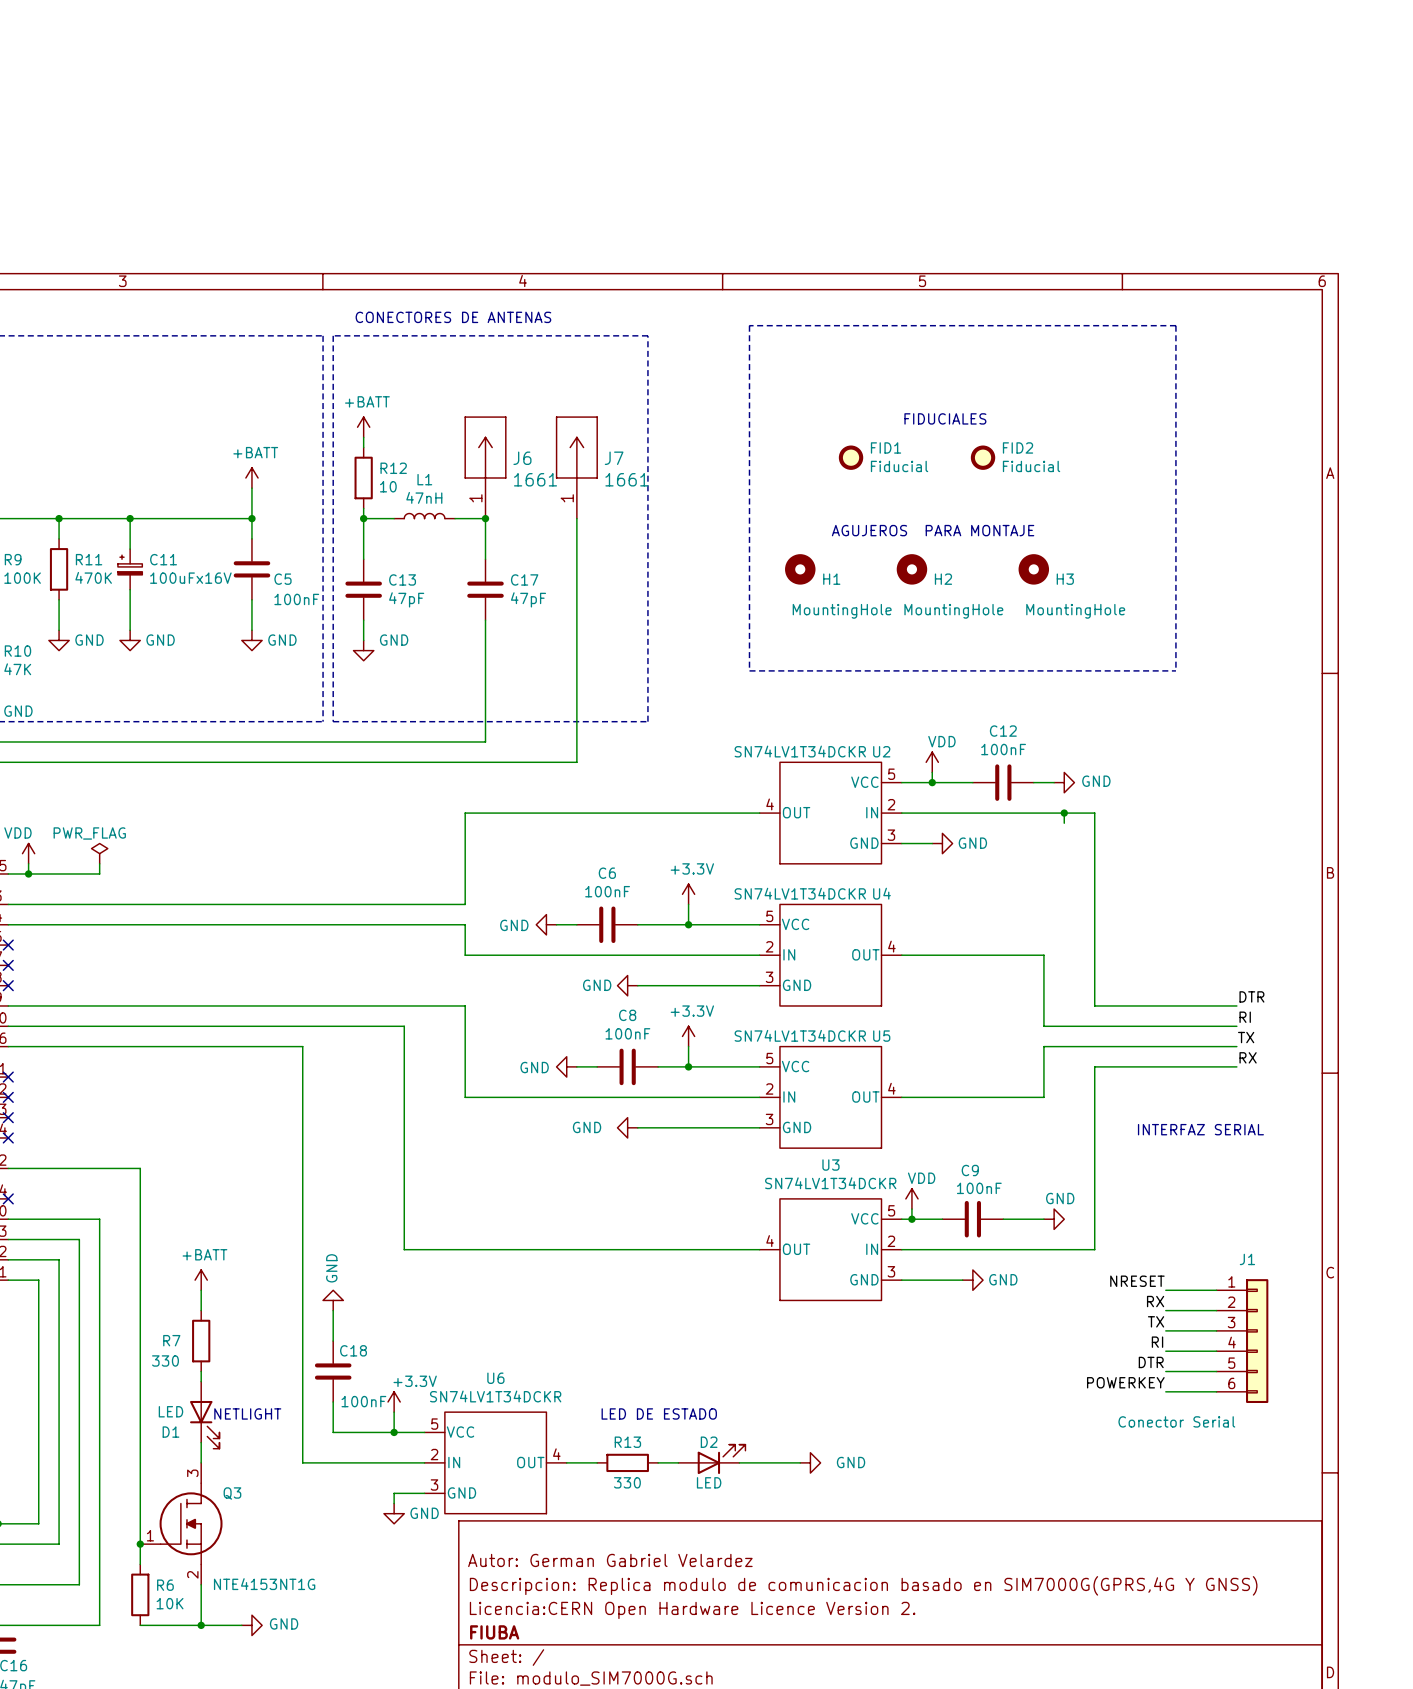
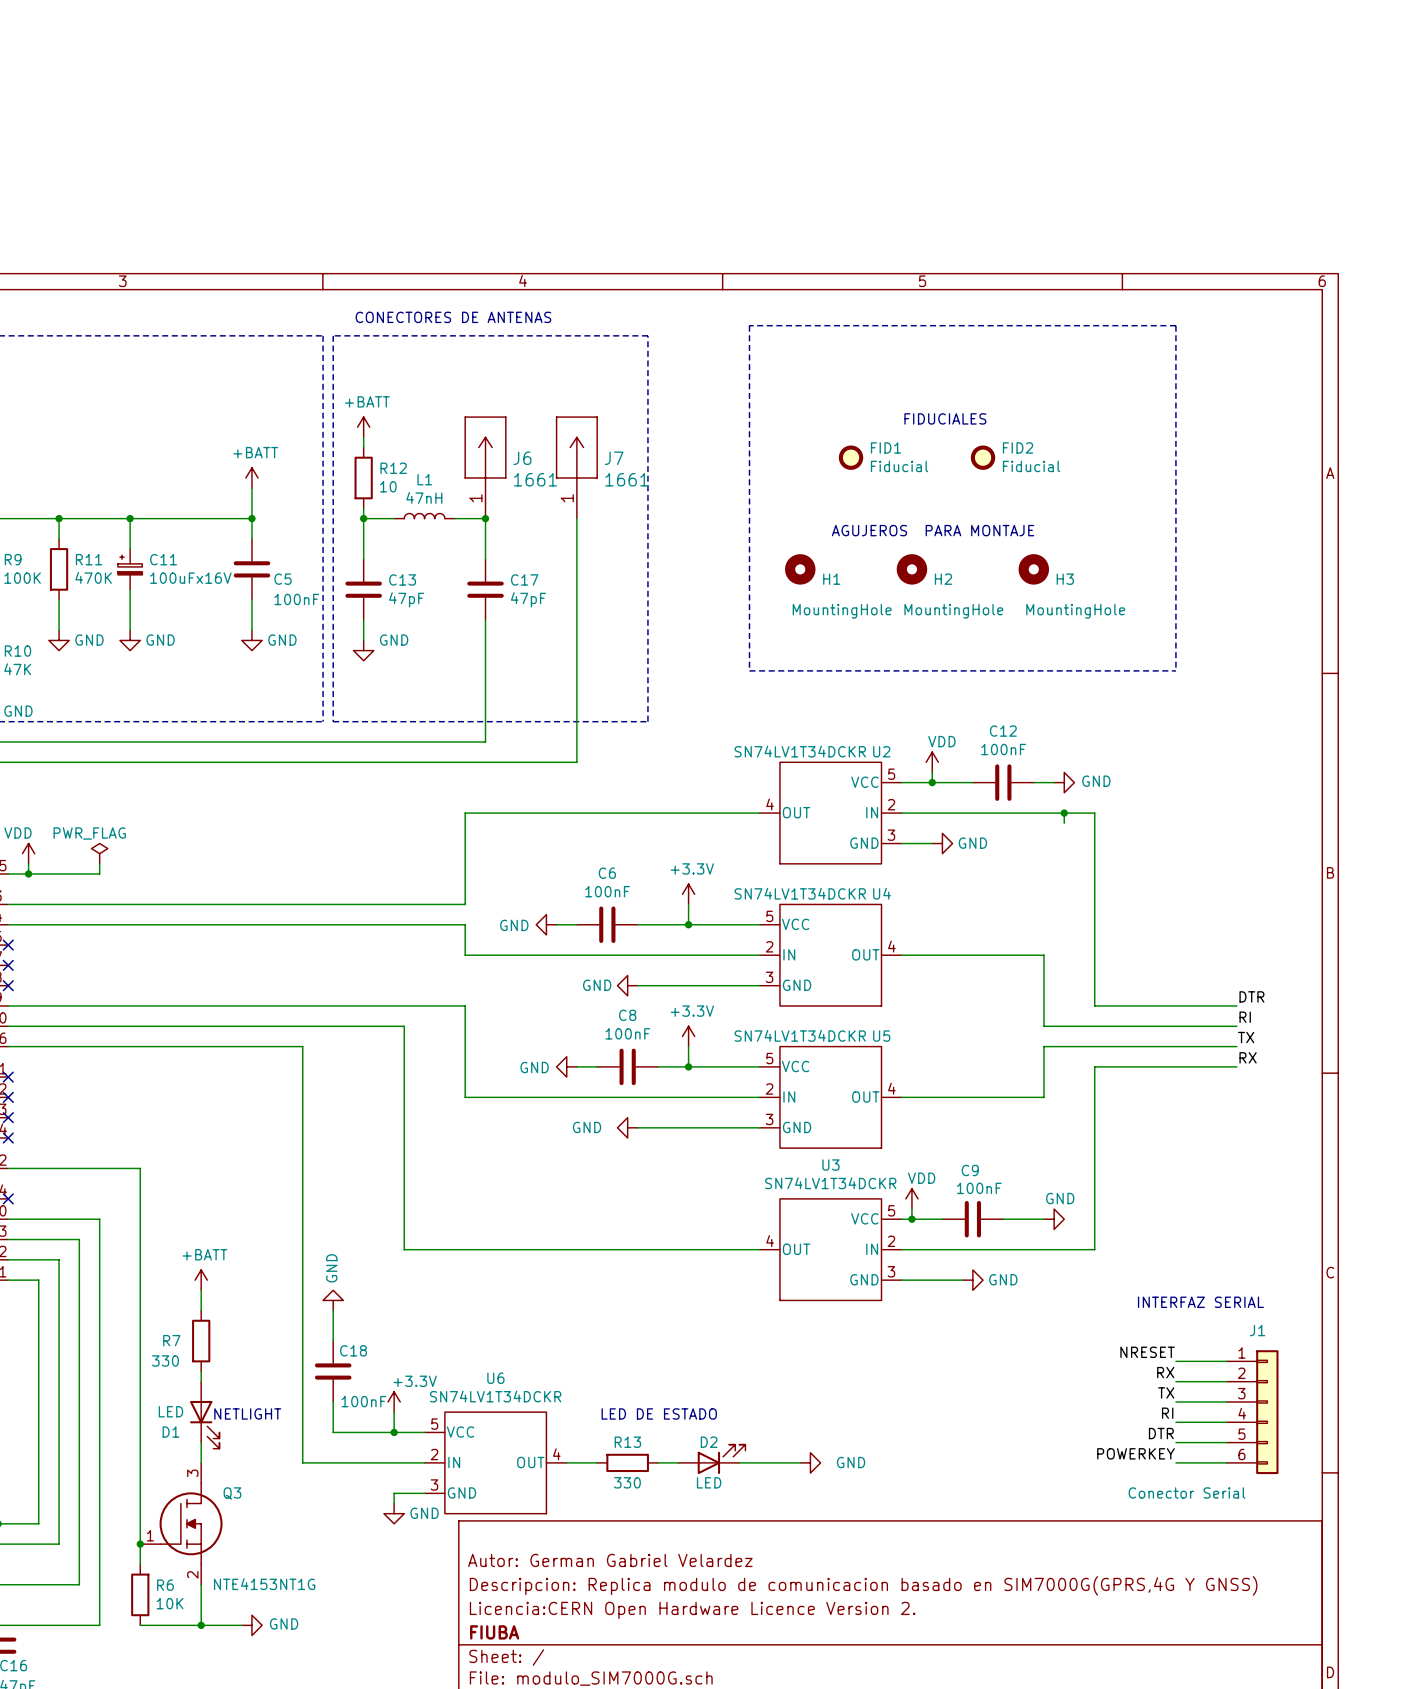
text position: INTERFAZ SERIAL (1200, 1129) -> INTERFAZ SERIAL (1200, 1302)
label position: NRESET (1137, 1281) -> NRESET (1147, 1352)
wire: (1165, 1290) (1216, 1290) -> (1175, 1361) (1226, 1361)
label position: RX (1155, 1301) -> RX (1165, 1372)
wire: (1165, 1310) (1216, 1310) -> (1175, 1381) (1226, 1381)
label position: TX (1156, 1321) -> TX (1166, 1392)
wire: (1165, 1330) (1216, 1330) -> (1175, 1401) (1226, 1401)
J1 position: (1242, 1341) -> (1252, 1412)
label position: RI (1157, 1342) -> RI (1167, 1413)
wire: (1165, 1351) (1216, 1351) -> (1175, 1422) (1226, 1422)
label position: DTR (1151, 1362) -> DTR (1161, 1433)
wire: (1165, 1371) (1216, 1371) -> (1175, 1442) (1226, 1442)
label position: POWERKEY (1125, 1382) -> POWERKEY (1135, 1453)
wire: (1165, 1391) (1216, 1391) -> (1175, 1462) (1226, 1462)

